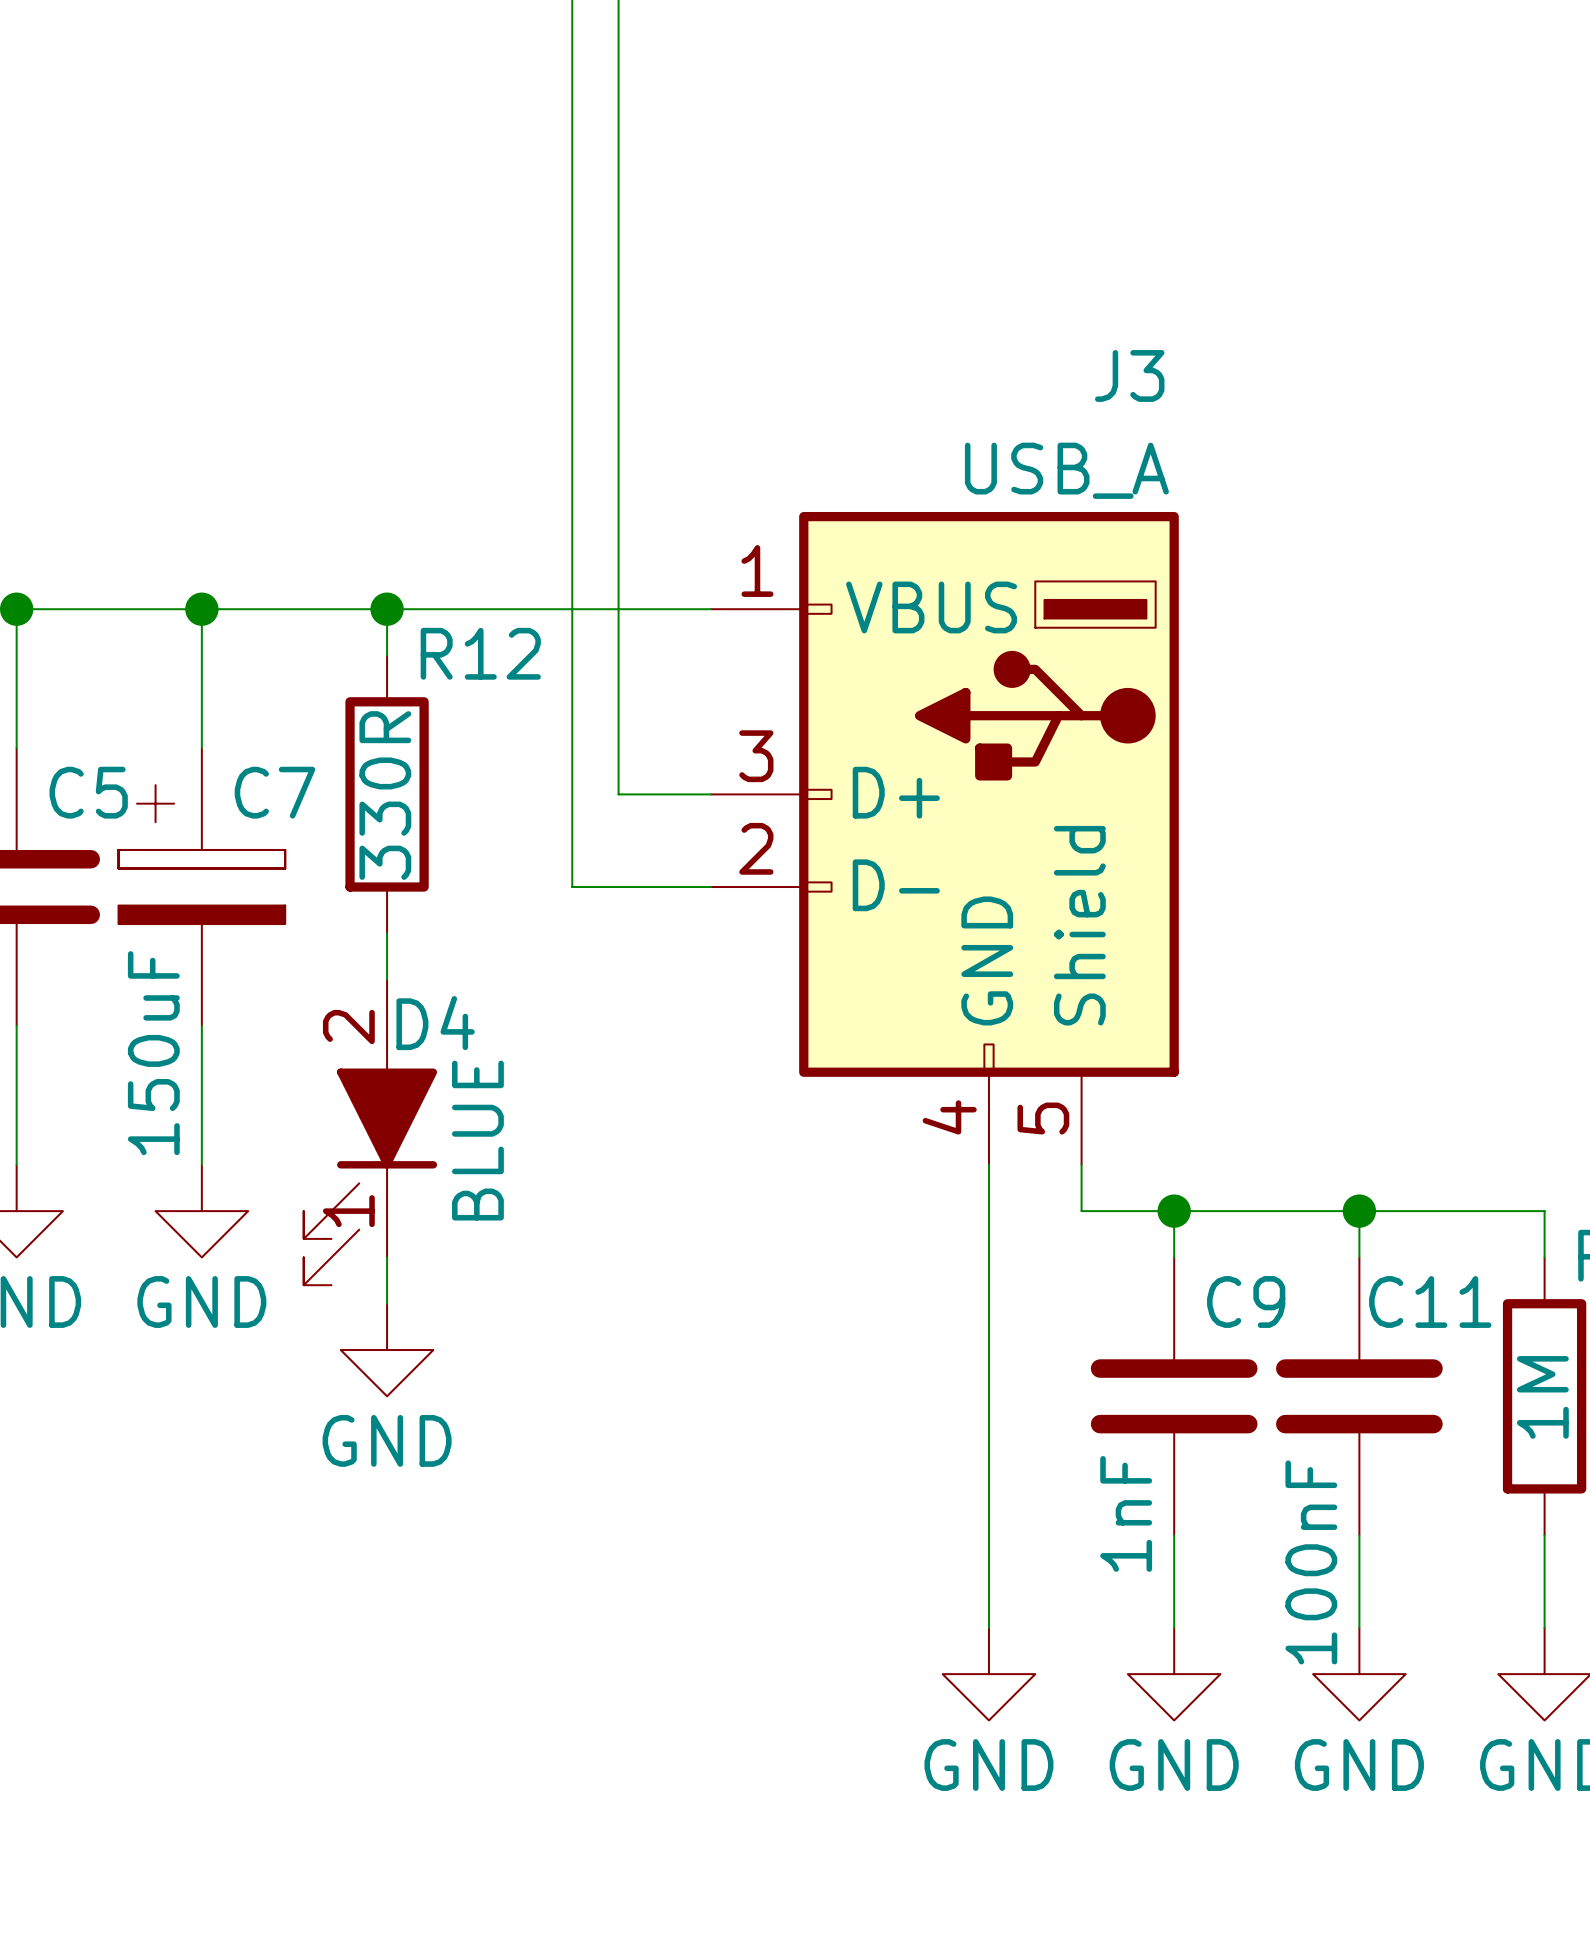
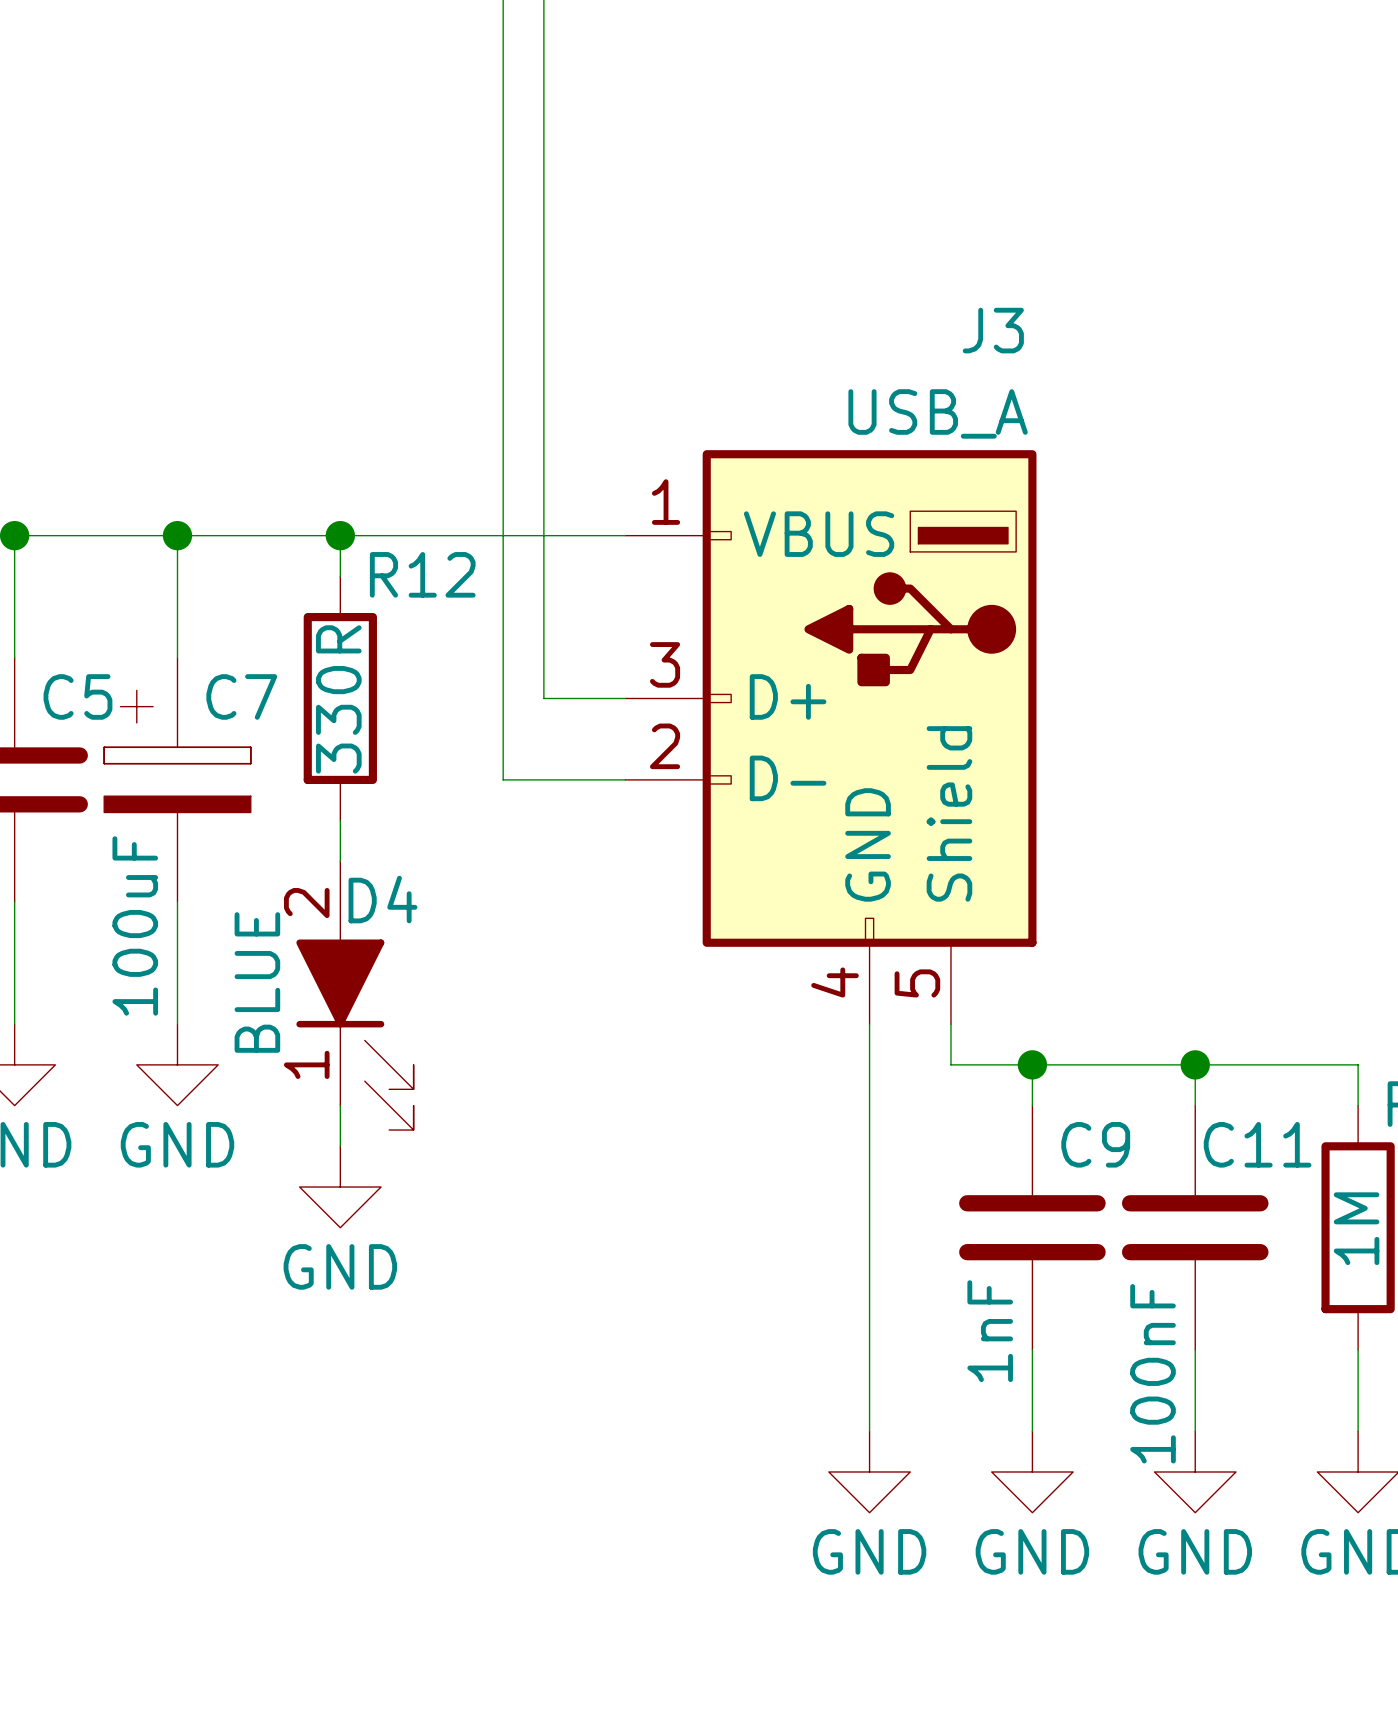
C7 value: 150uF (153, 1053) -> 100uF (135, 925)
D4 flip: as is (370, 1176) -> left-right (354, 1034)

